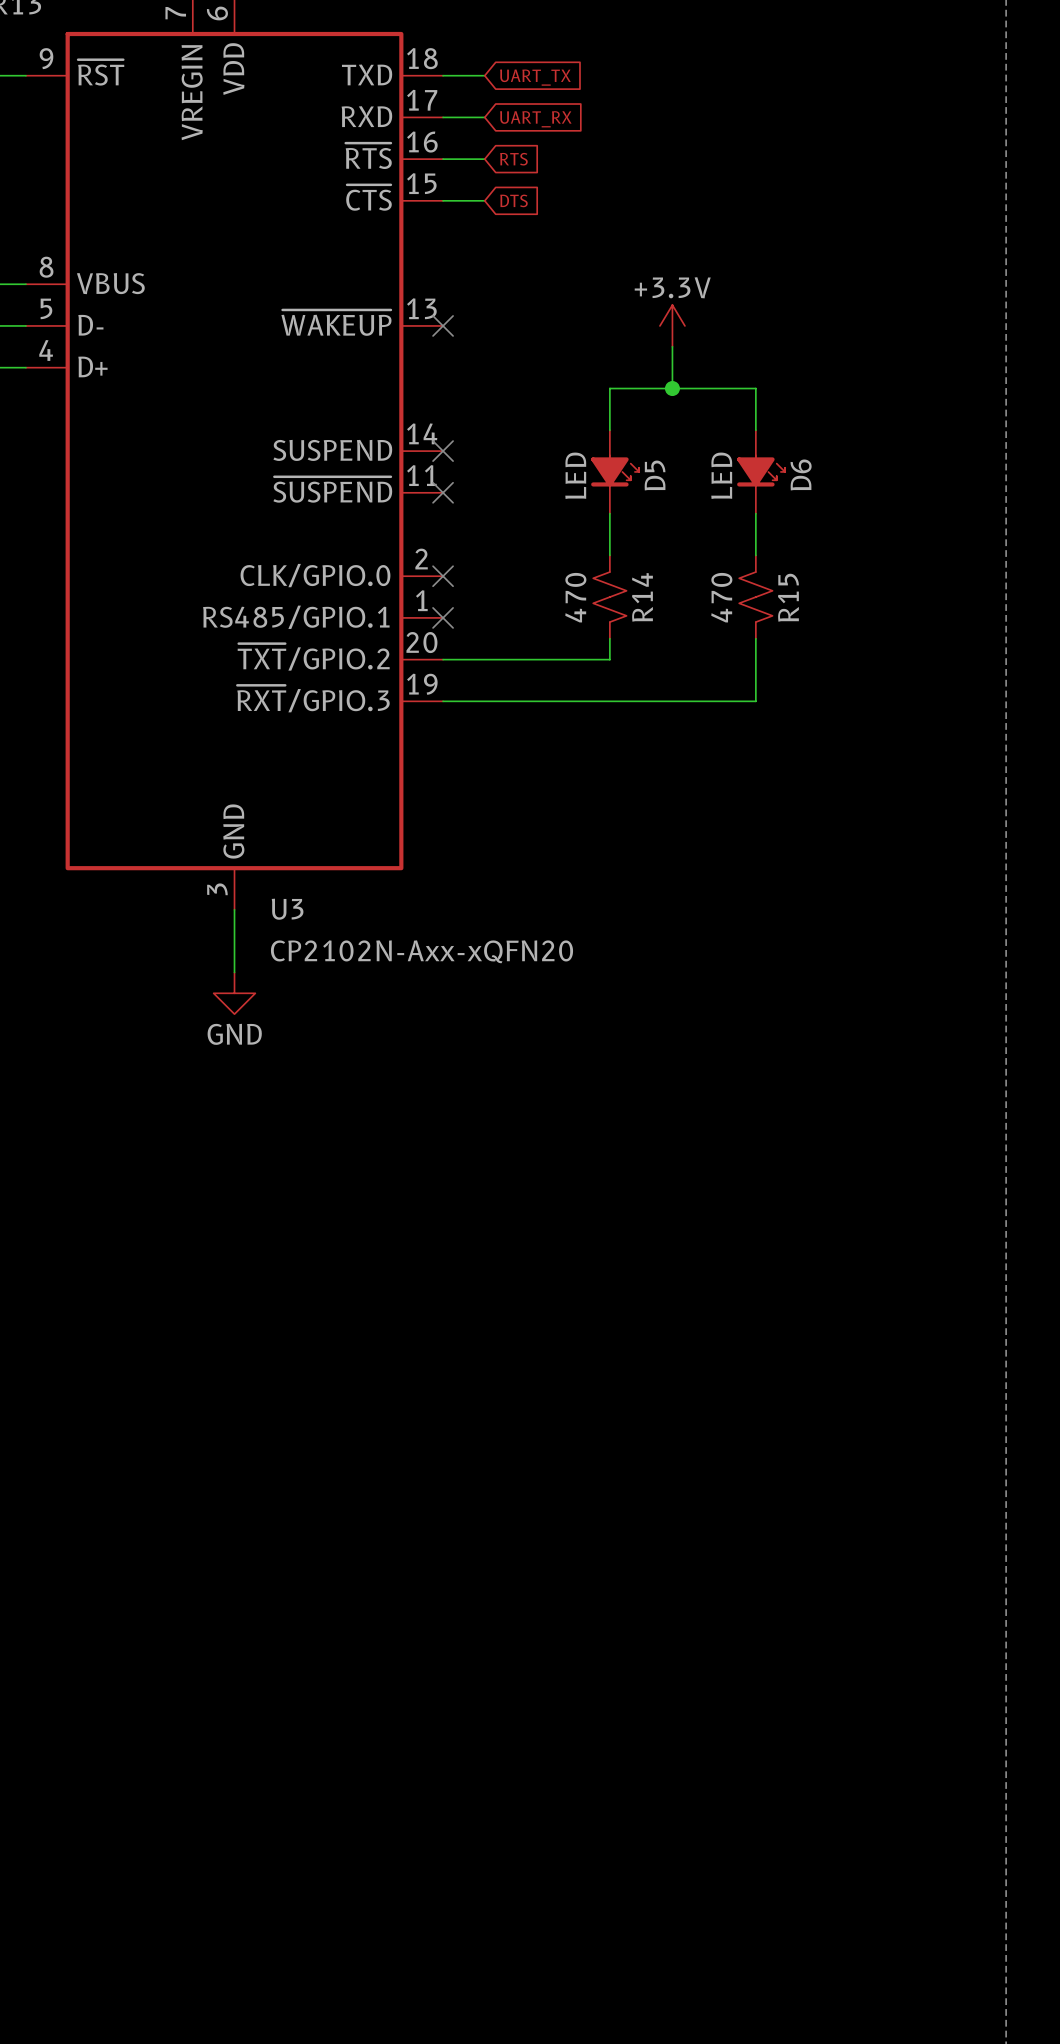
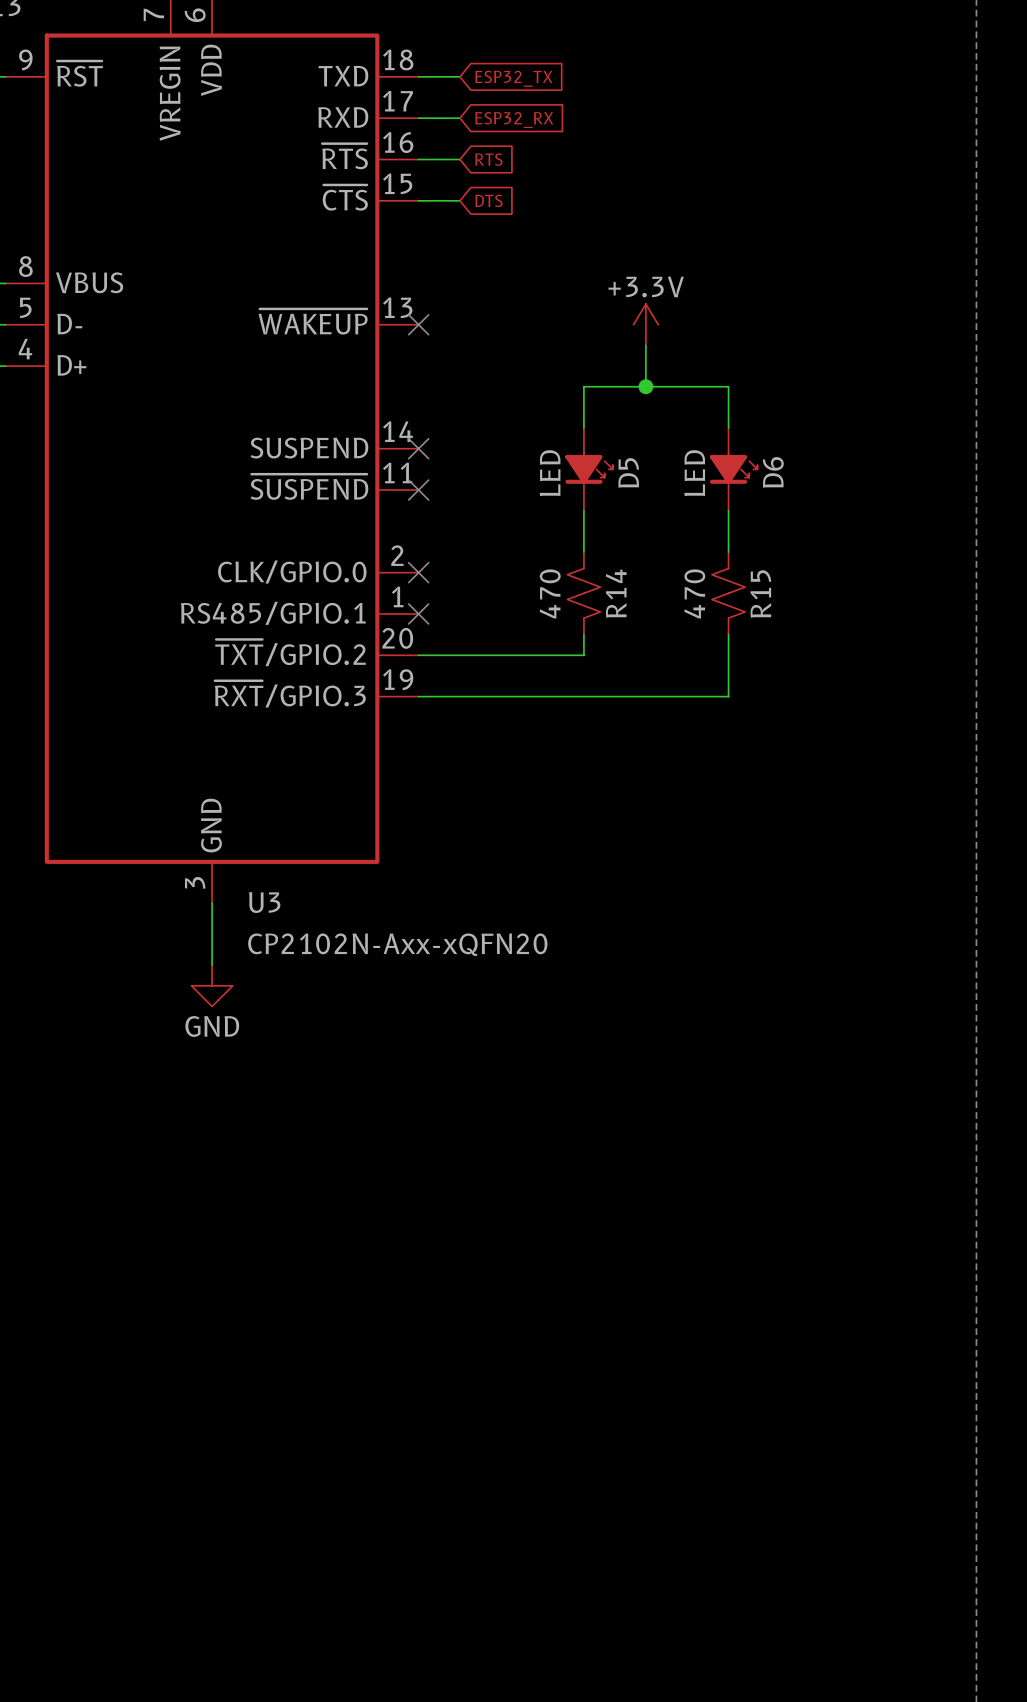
global label: UART_TX (535, 77) -> ESP32_TX (513, 78)
global label: UART_RX (535, 119) -> ESP32_RX (514, 120)

